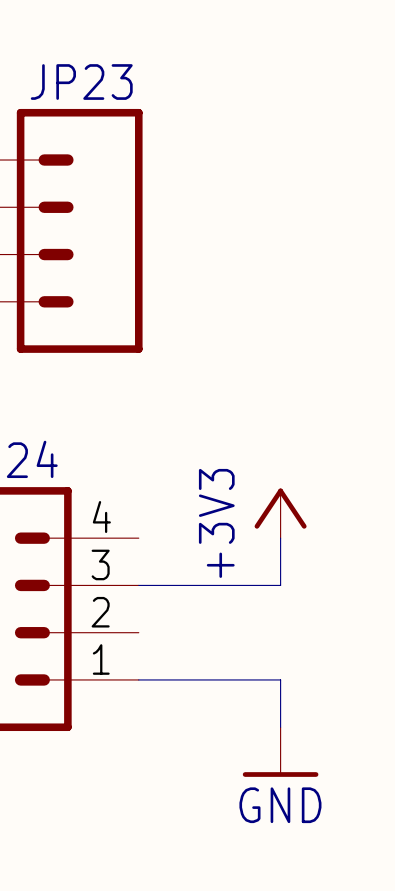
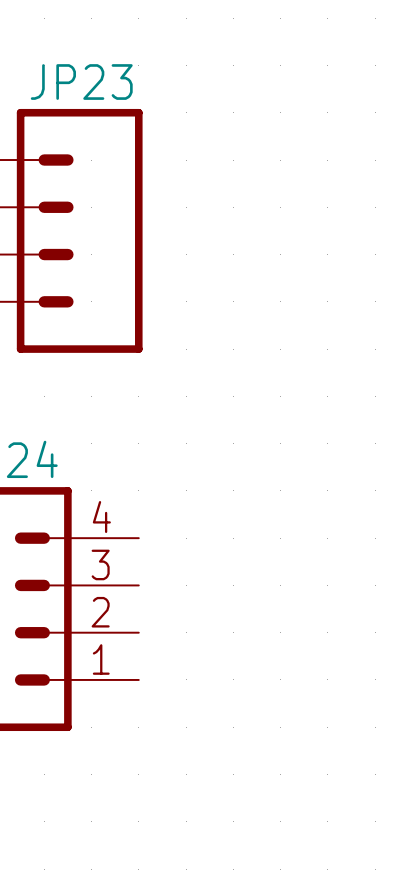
power symbol: +3V3 (280, 513) -> none
wire: (280, 538) (280, 585) (138, 585) -> none
wire: (138, 679) (280, 679) (280, 727) -> none
power symbol: GND (280, 752) -> none

